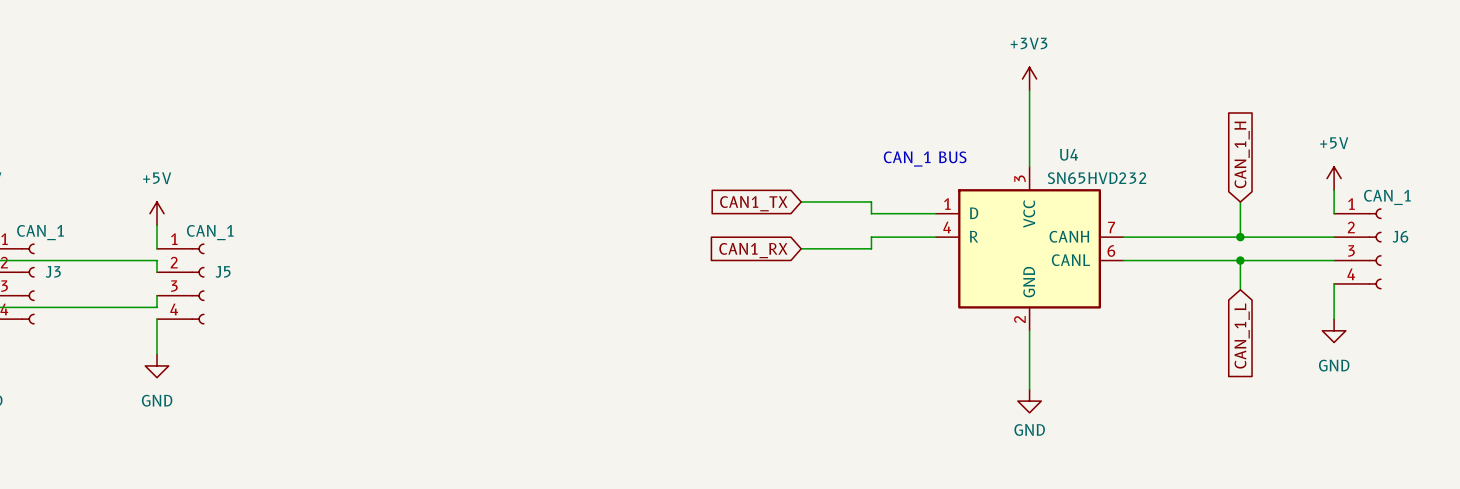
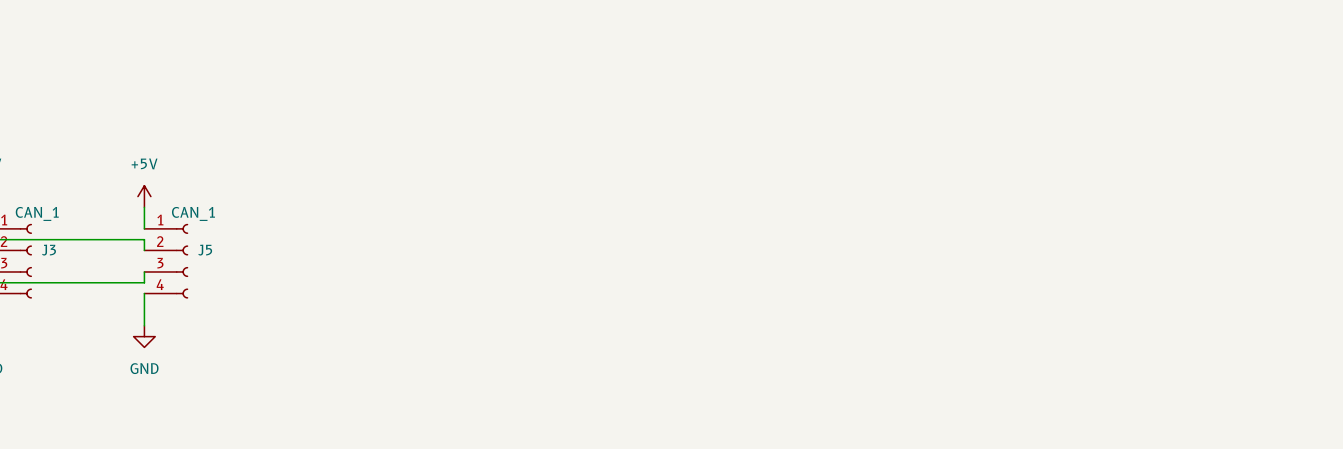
power symbol: +3V3 (1029, 79) -> none
wire: (1029, 90) (1029, 166) -> none
global label: CAN_1_H (1242, 154) -> none
text: CAN_1 BUS (925, 159) -> none
power symbol: +5V (1334, 178) -> none
wire: (1334, 190) (1334, 213) -> none
wire: (801, 201) (871, 201) (871, 213) (935, 213) -> none
wire: (1240, 201) (1240, 237) -> none
global label: CAN1_TX (753, 203) -> none
wire: (935, 237) (871, 237) (871, 248) (801, 248) -> none
wire: (1123, 237) (1334, 237) -> none
junction: (1240, 237) -> none
U4: SN65HVD232 (1029, 248) -> none
J6: CAN_1 (1357, 248) -> none
global label: CAN1_RX (753, 250) -> none
wire: (1123, 260) (1334, 260) -> none
wire: (1240, 260) (1240, 289) -> none
junction: (1240, 260) -> none
wire: (1334, 283) (1334, 319) -> none
wire: (1029, 330) (1029, 389) -> none
power symbol: GND (1334, 330) -> none
global label: CAN_1_L (1242, 336) -> none
power symbol: GND (1029, 401) -> none

